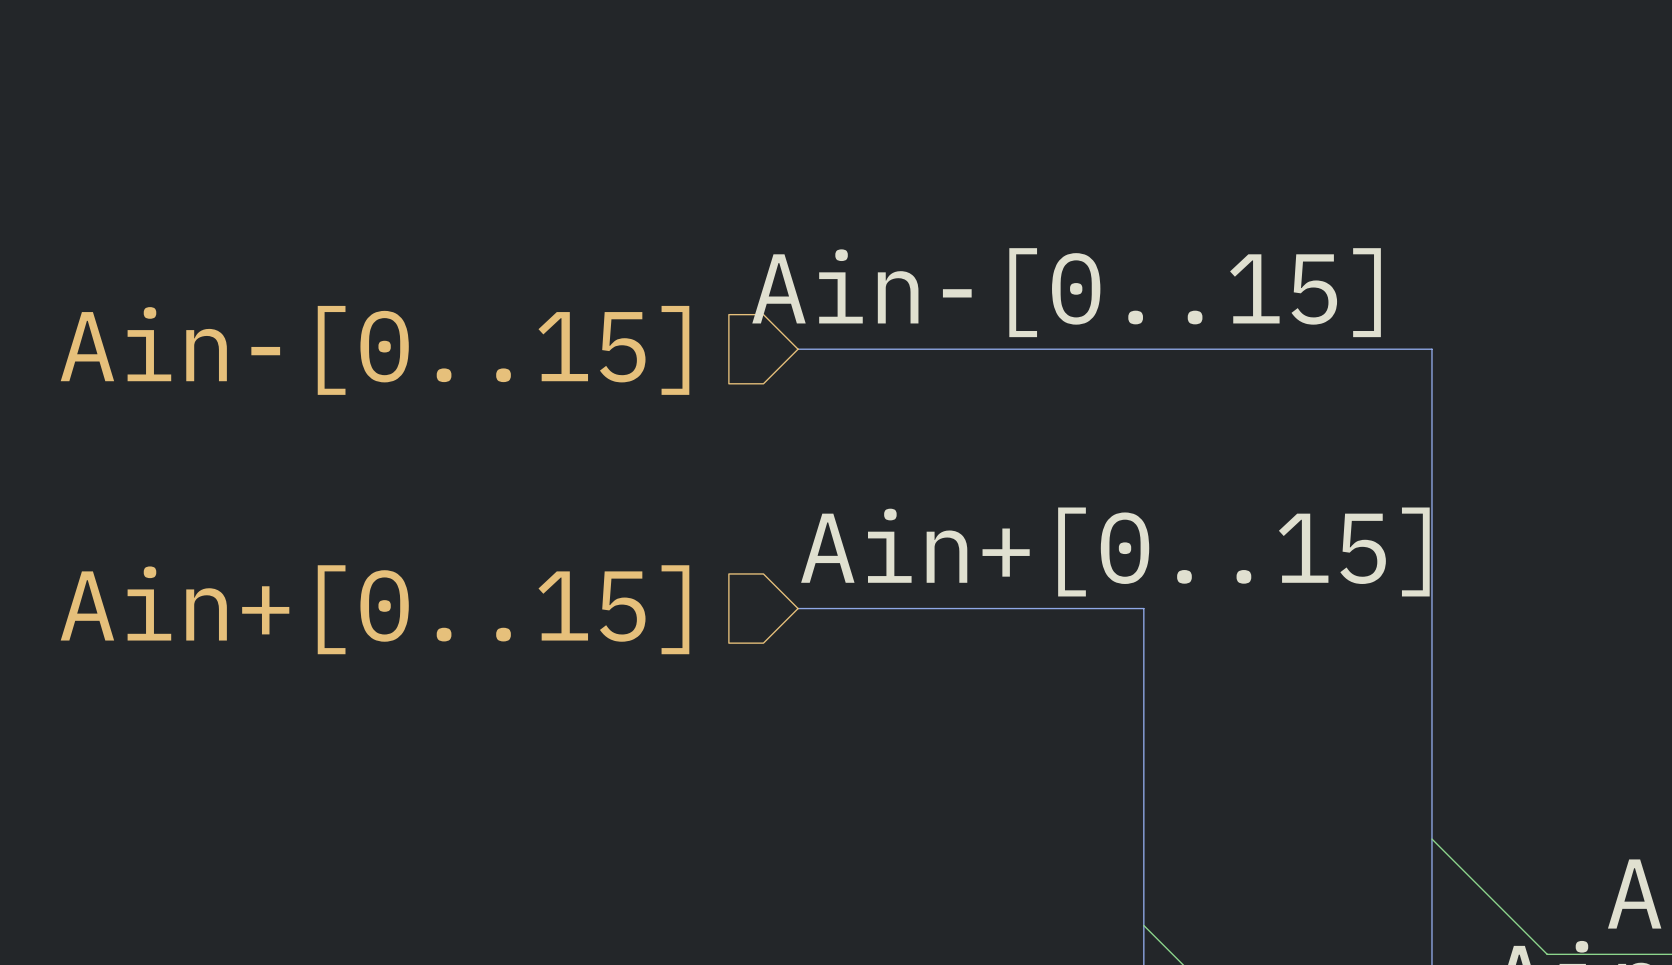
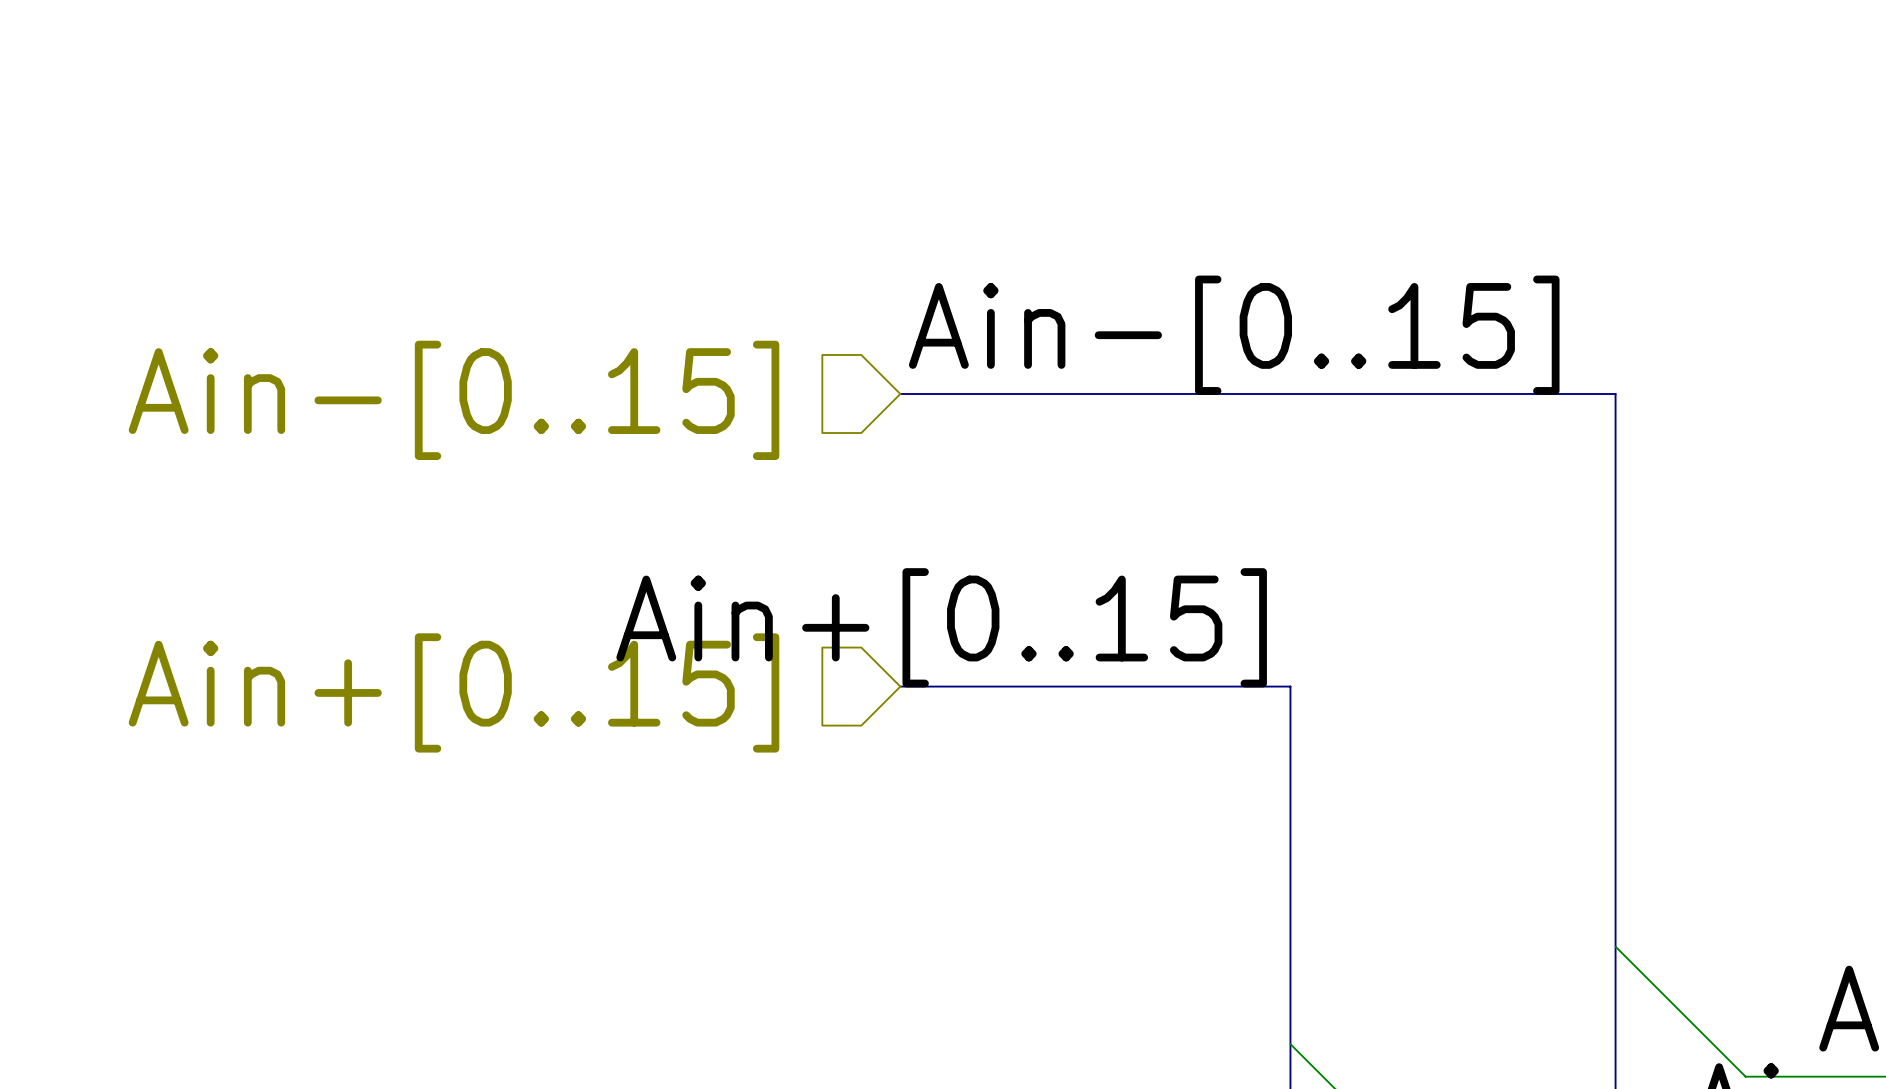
label position: Ain+[0..15] (1115, 551) -> Ain+[0..15] (941, 627)

